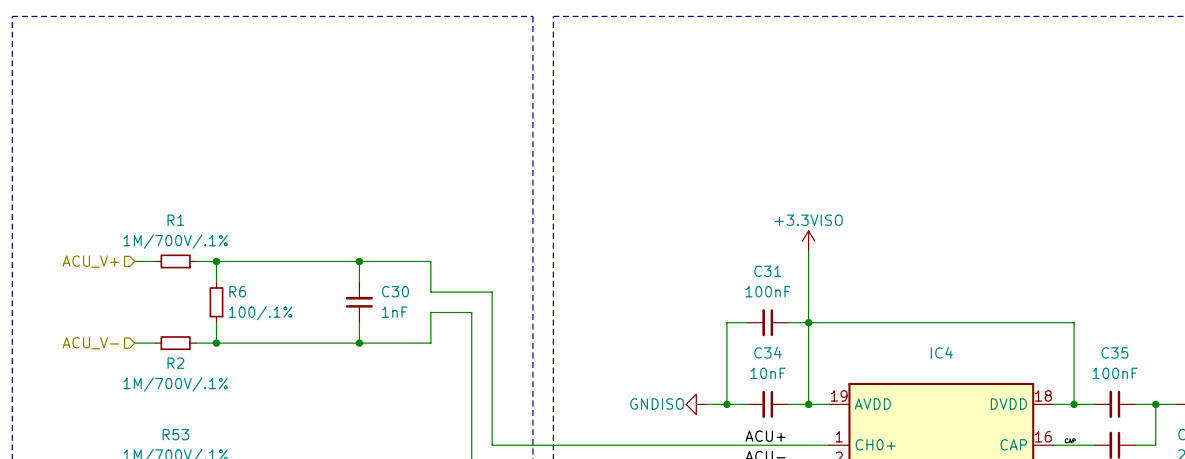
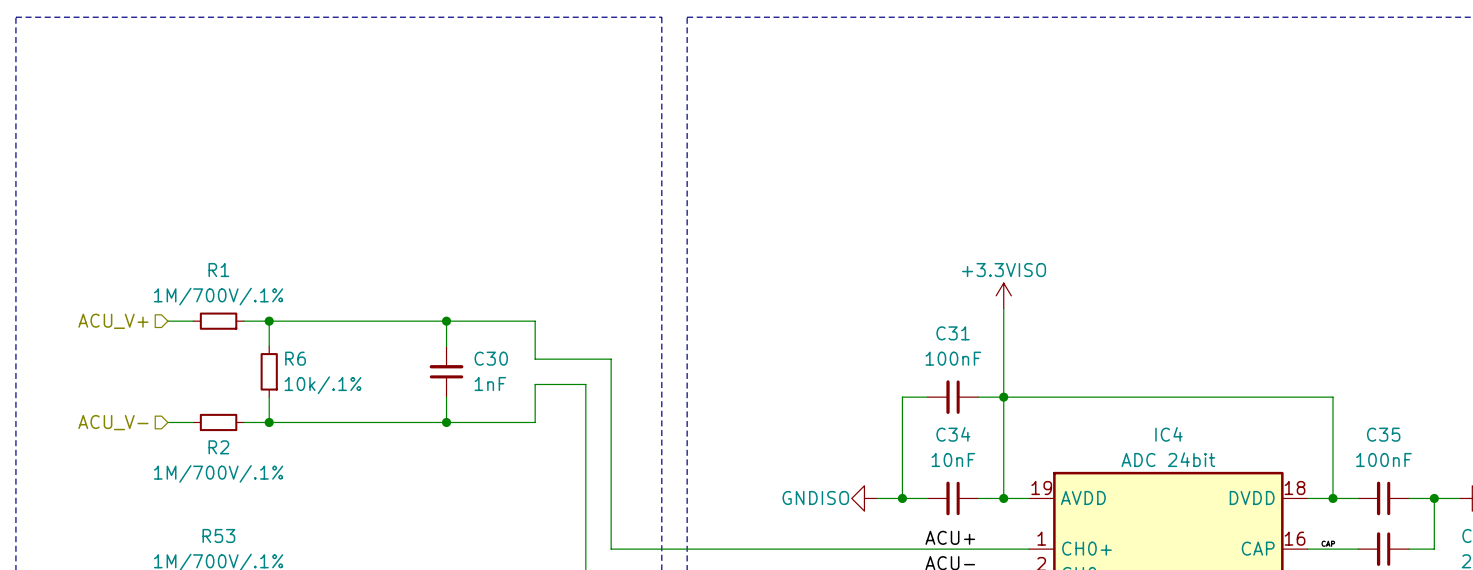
R6 value: 100/.1% (260, 313) -> 10k/.1% (322, 385)
IC4 value: none -> ADC 24bit (1168, 459)

